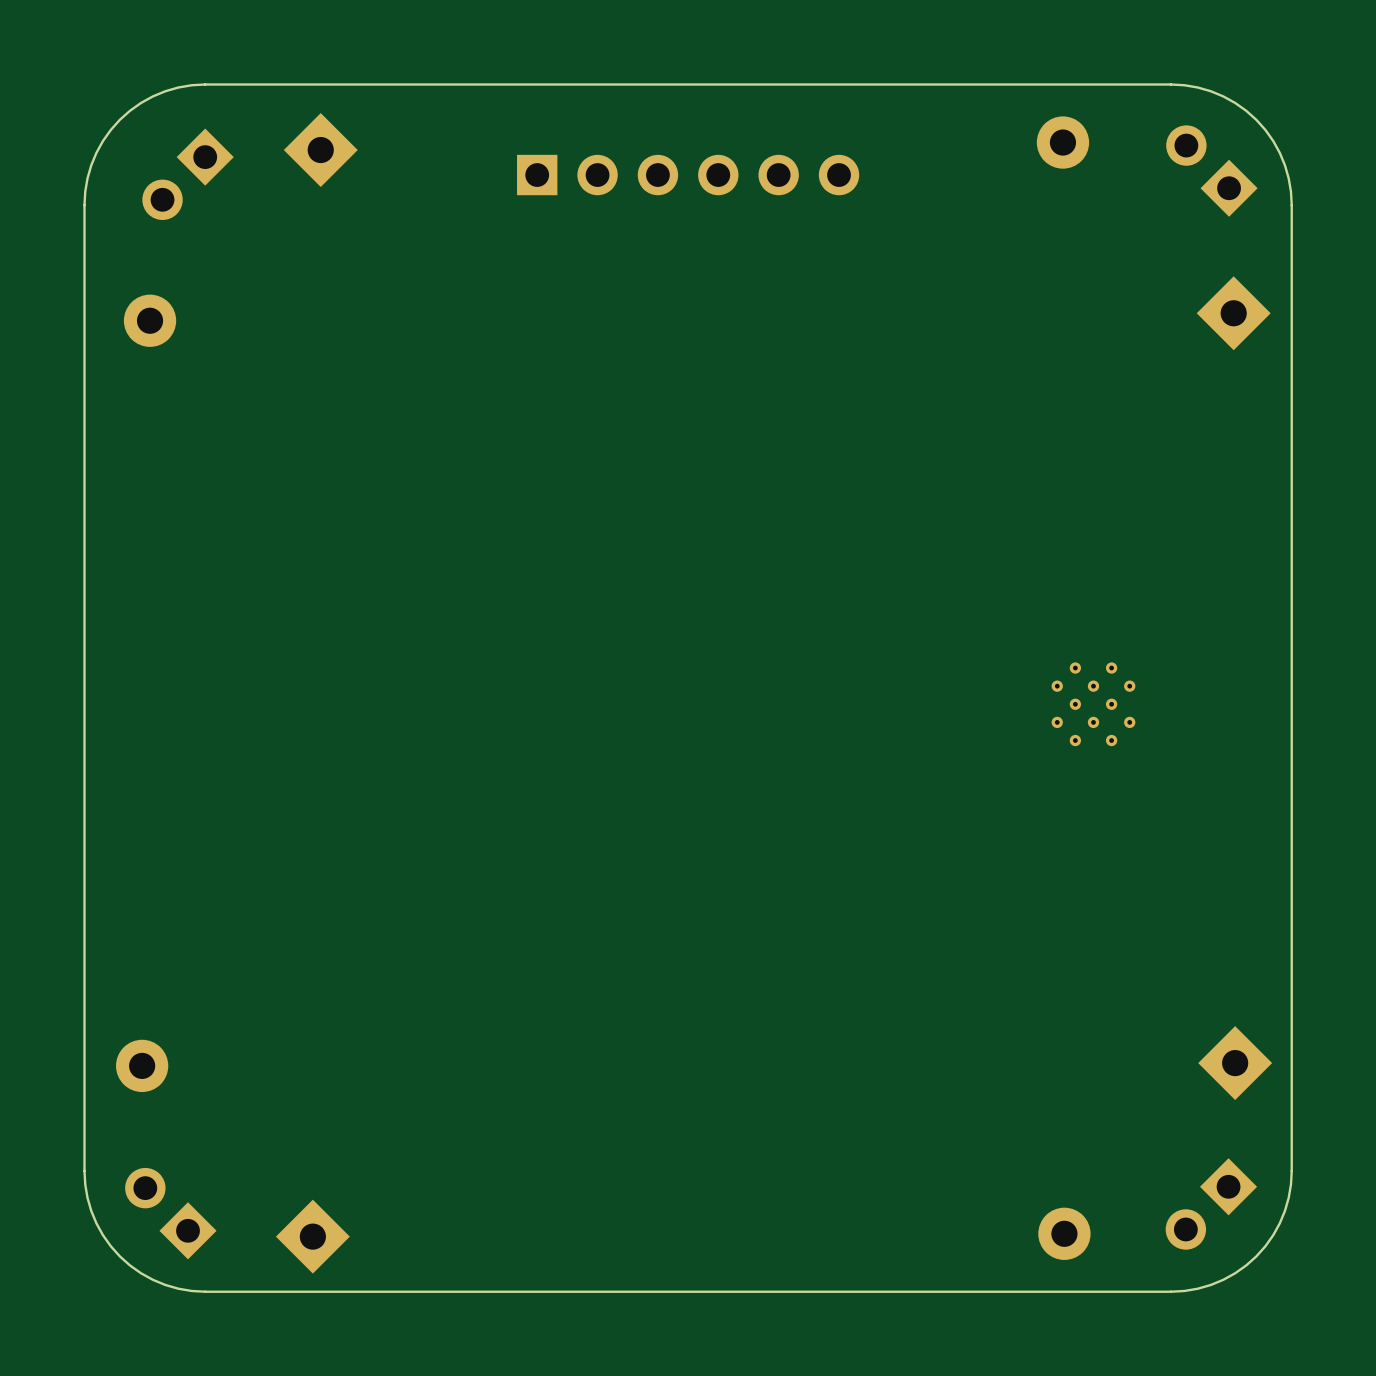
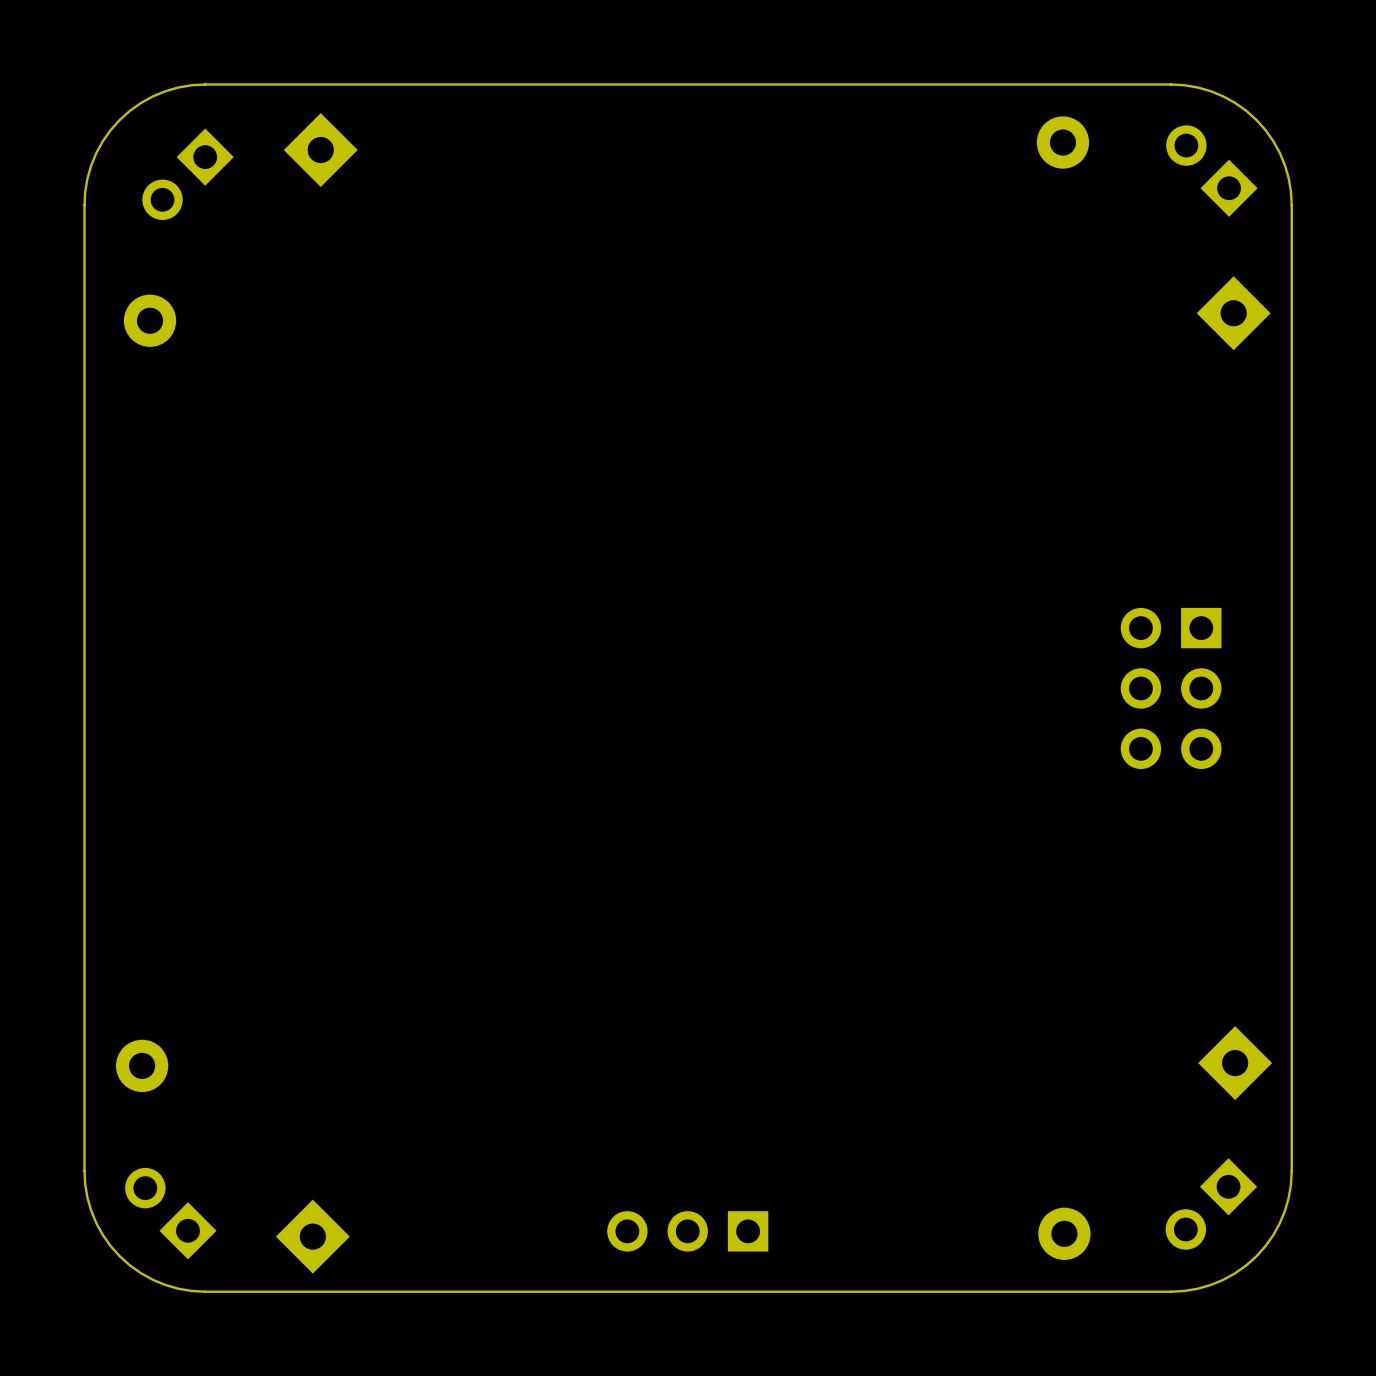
part: (688, 175) -> none
part: none -> (1171, 688)
part: (1093, 704) -> none
part: none -> (687, 1231)

